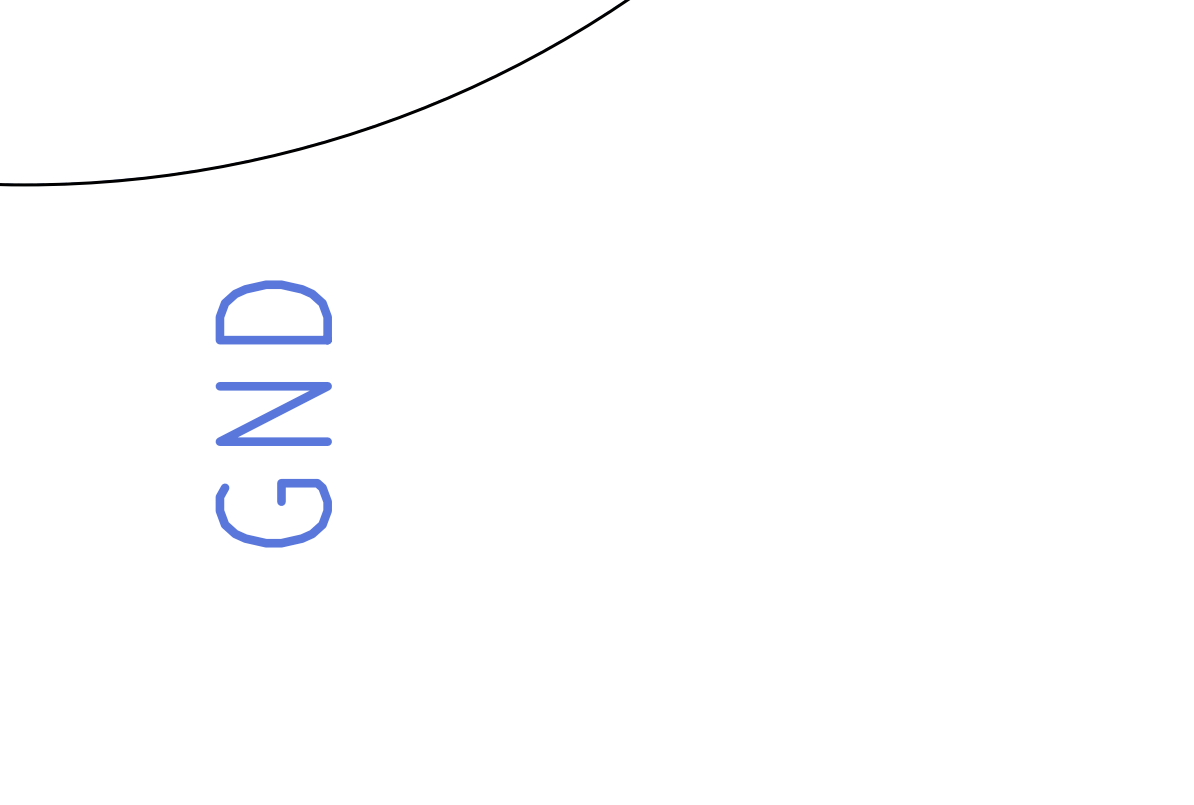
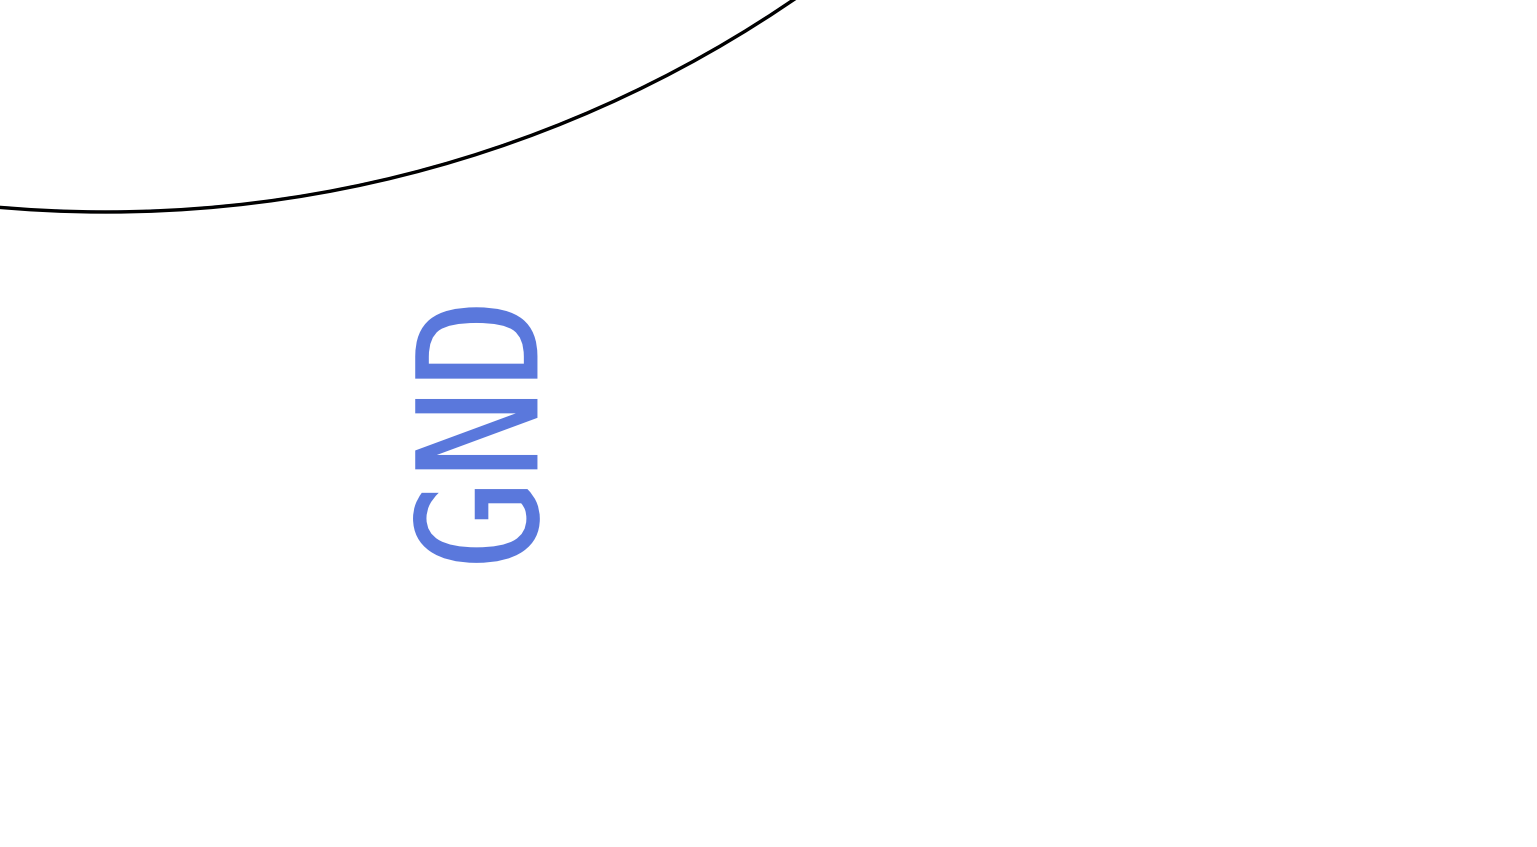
text position: GND (273, 413) -> GND (476, 435)

